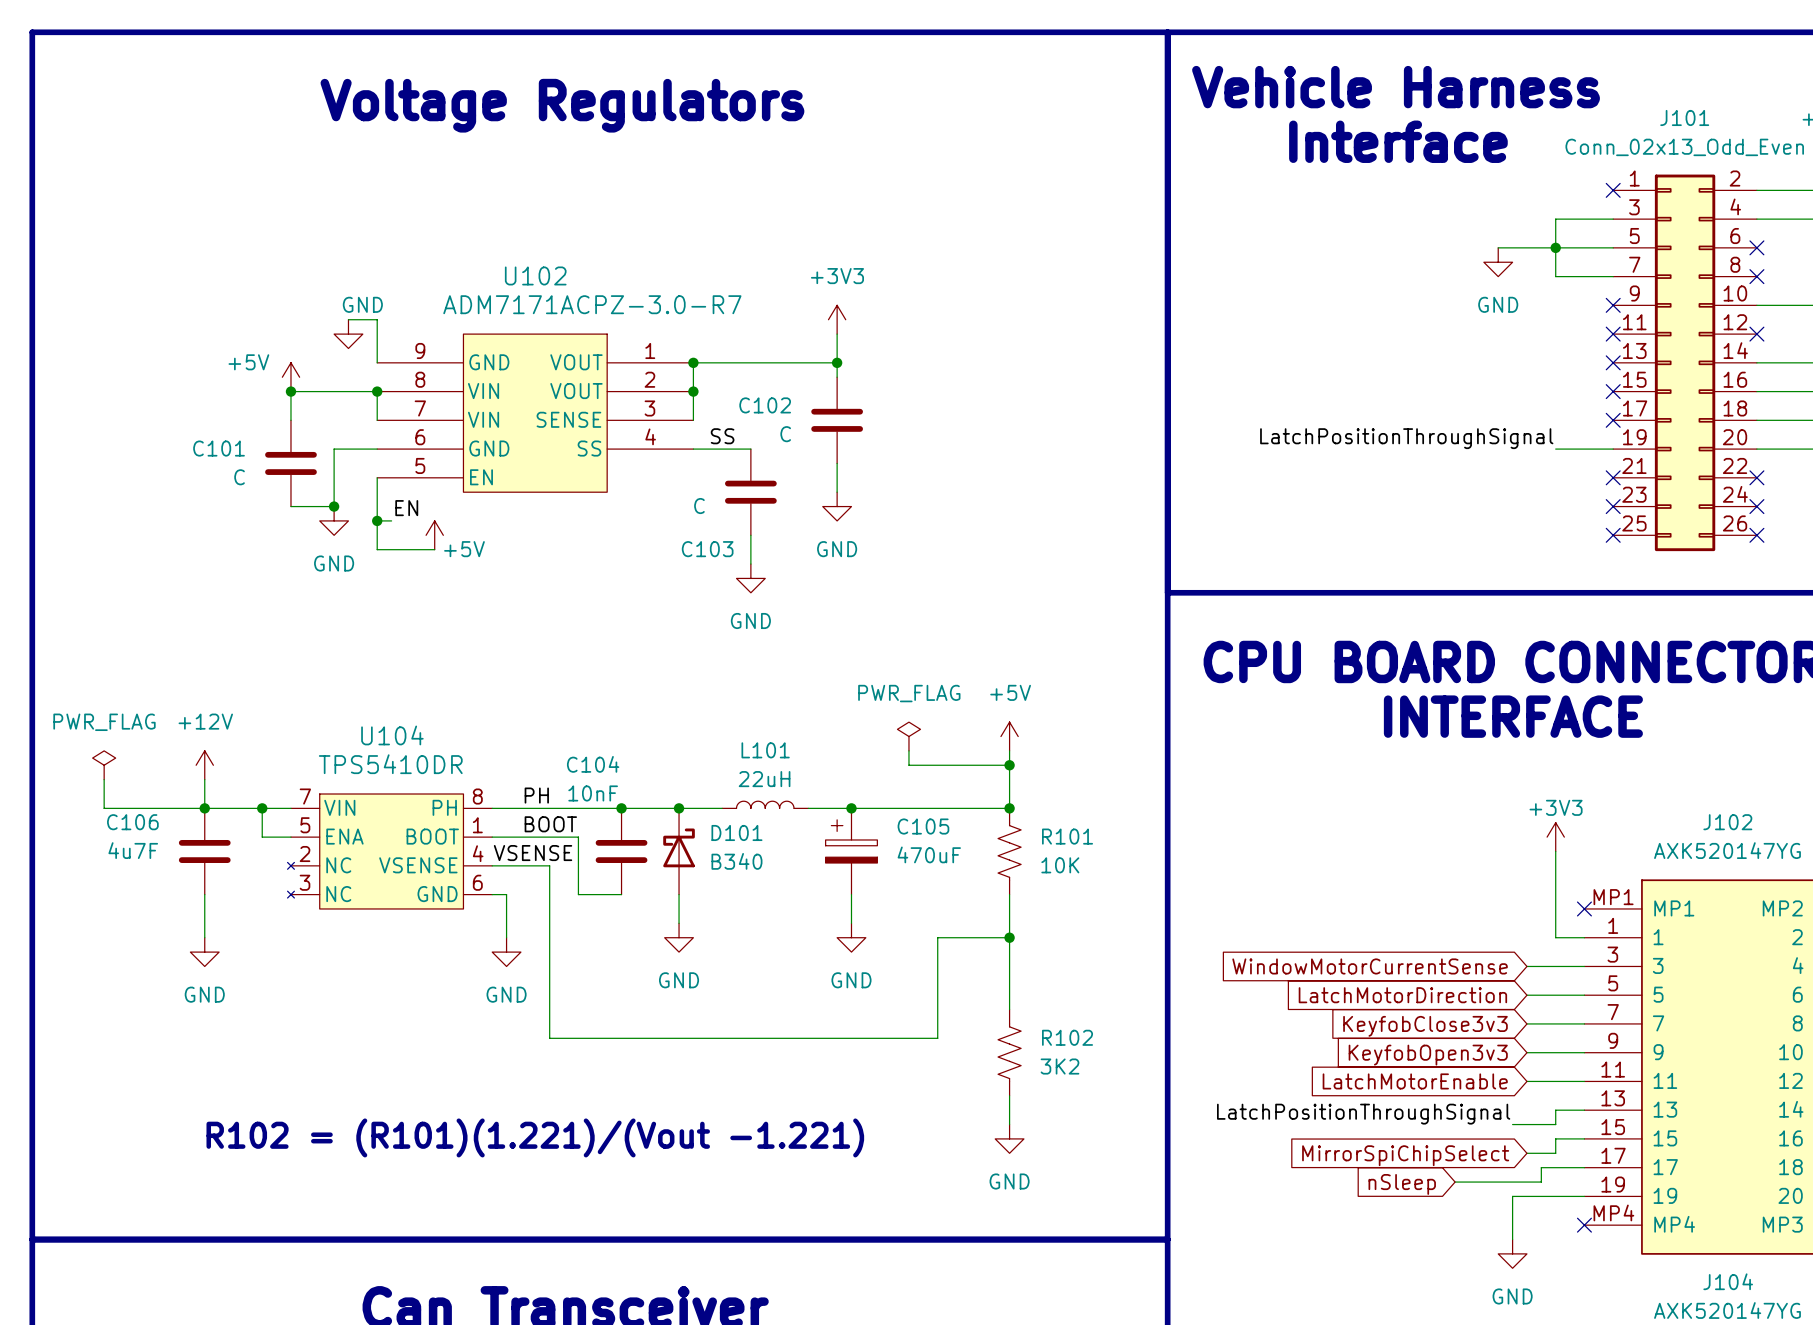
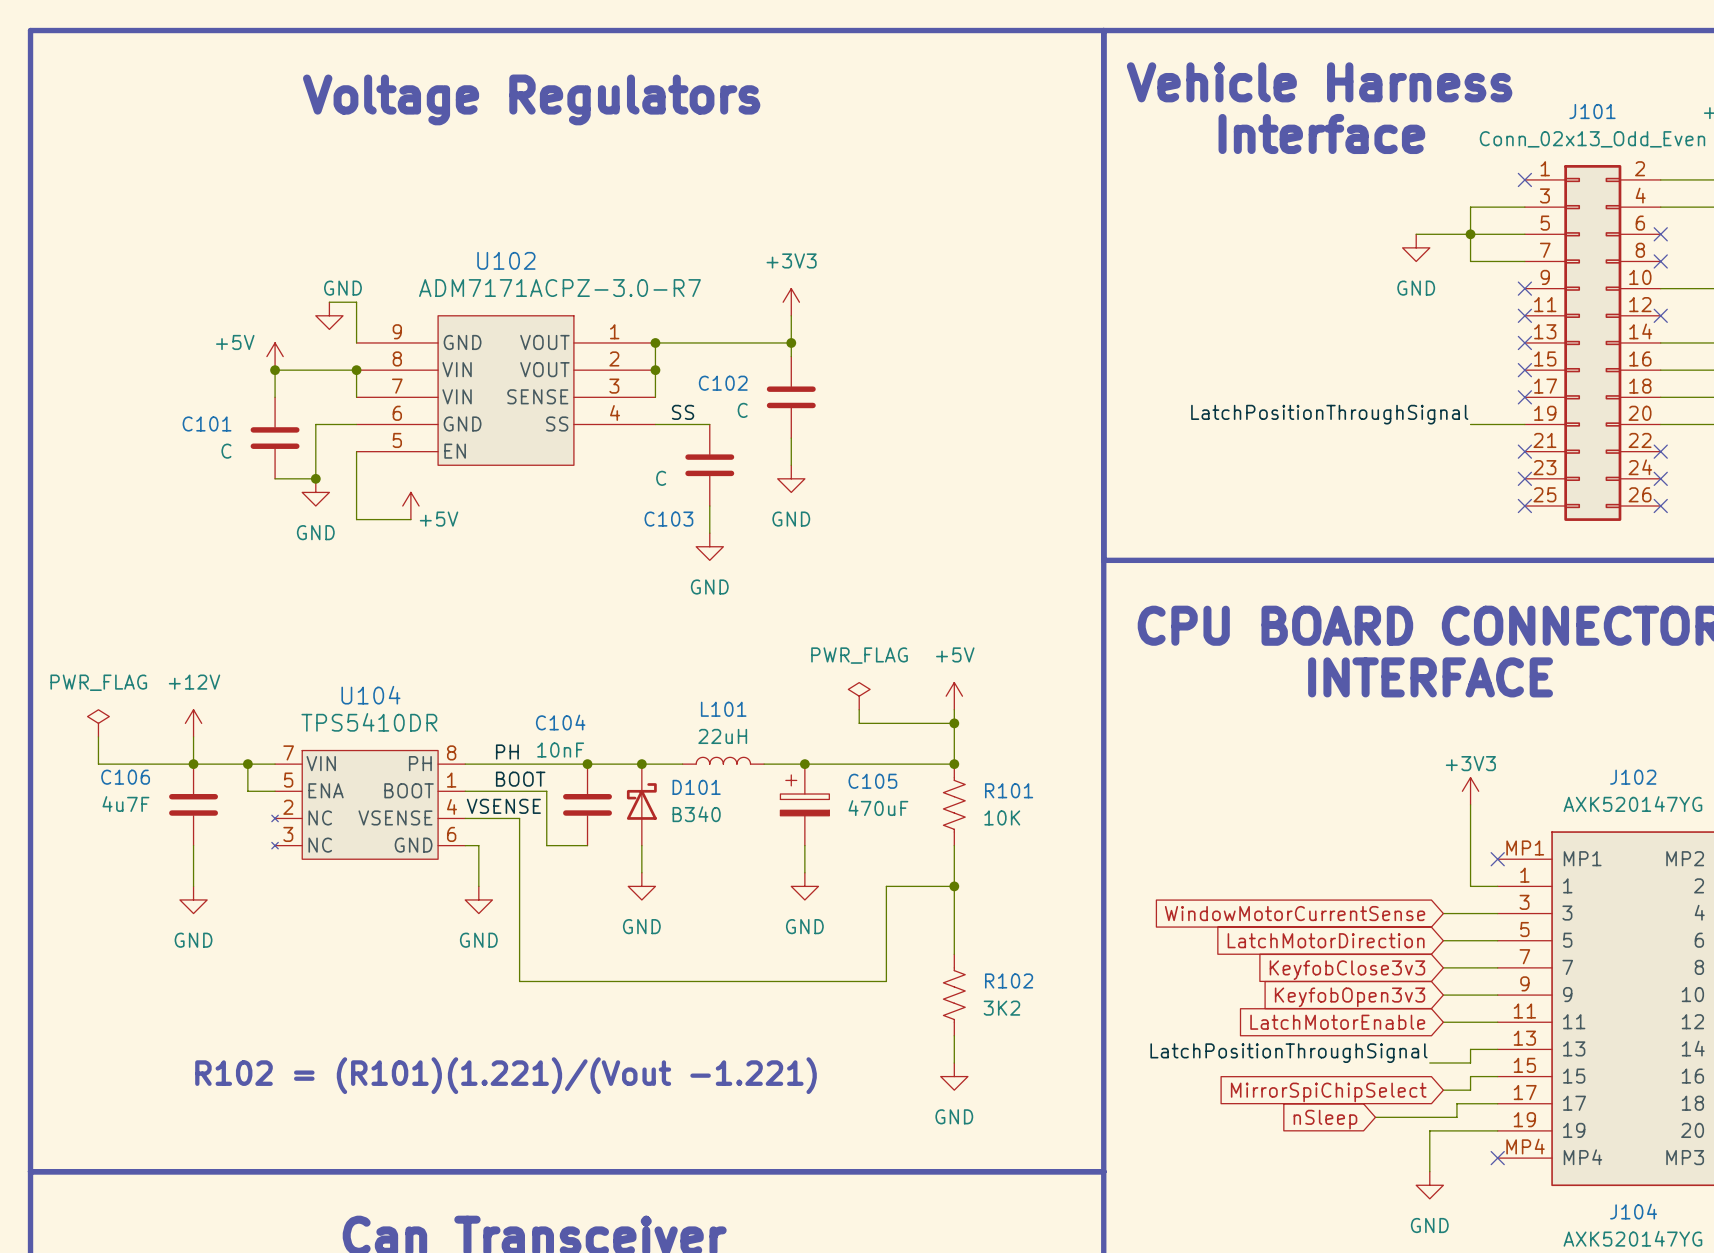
label: EN (406, 508) -> none
wire: (377, 520) (391, 520) -> none
junction: (377, 520) -> none

